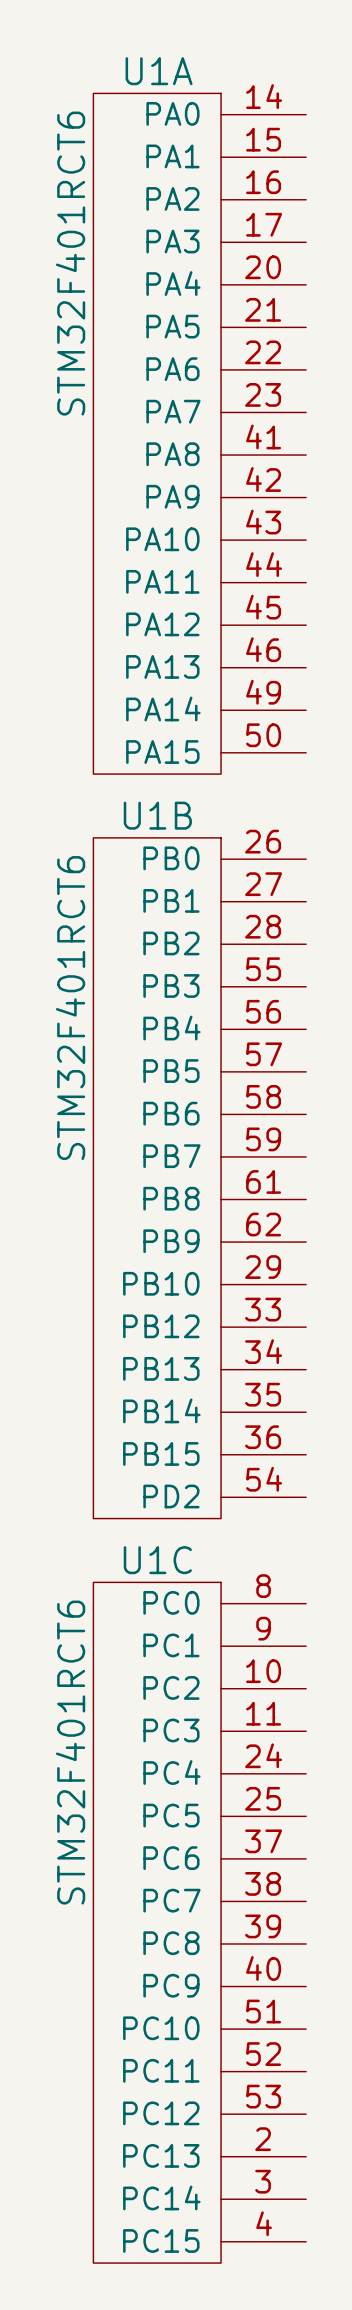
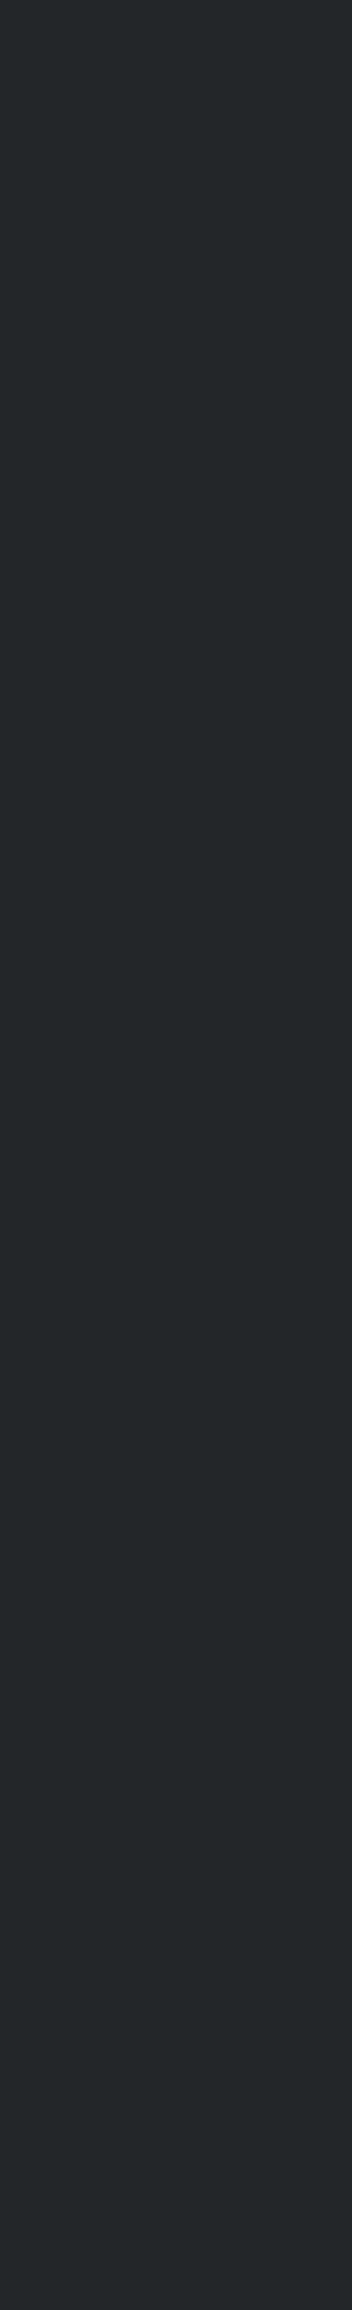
U1A: STM32F401RCT6 (199, 433) -> none
U1B: STM32F401RCT6 (199, 1178) -> none
U1C: STM32F401RCT6 (199, 1922) -> none

